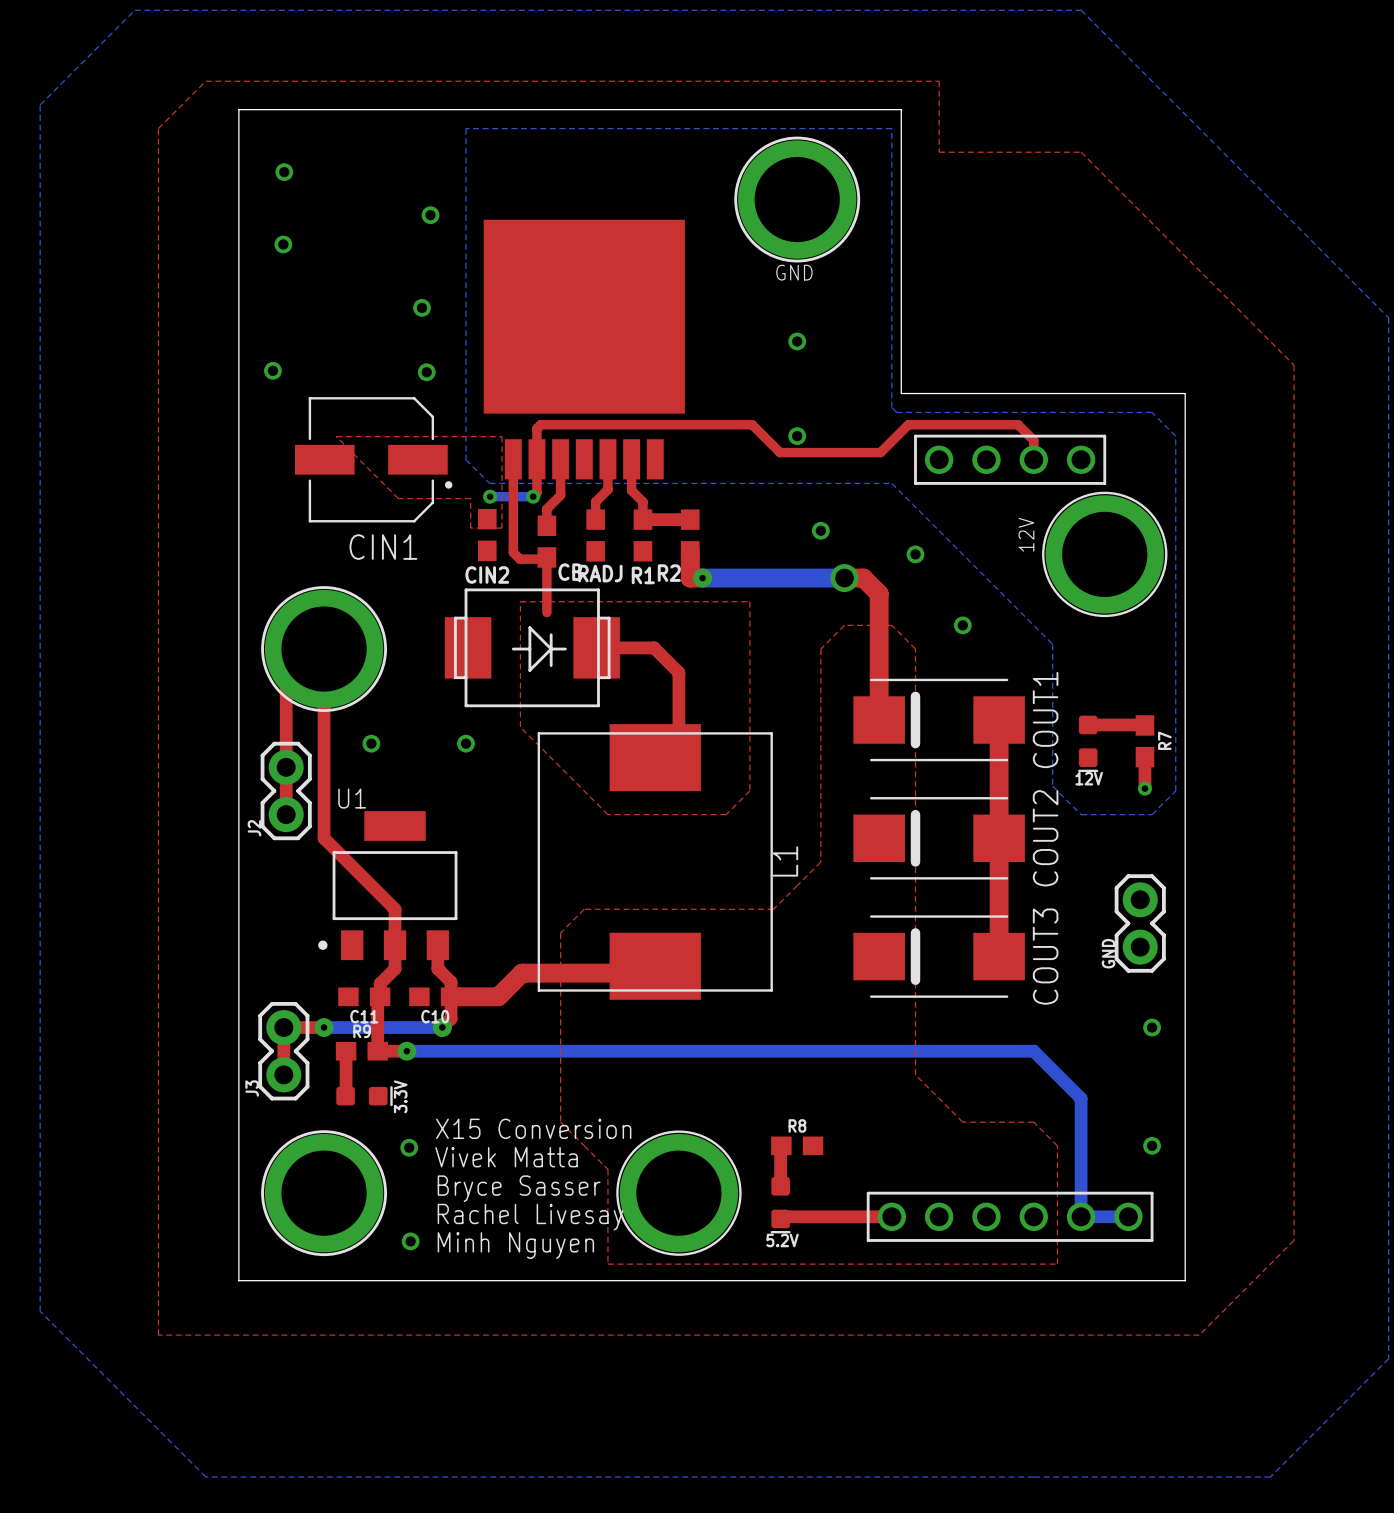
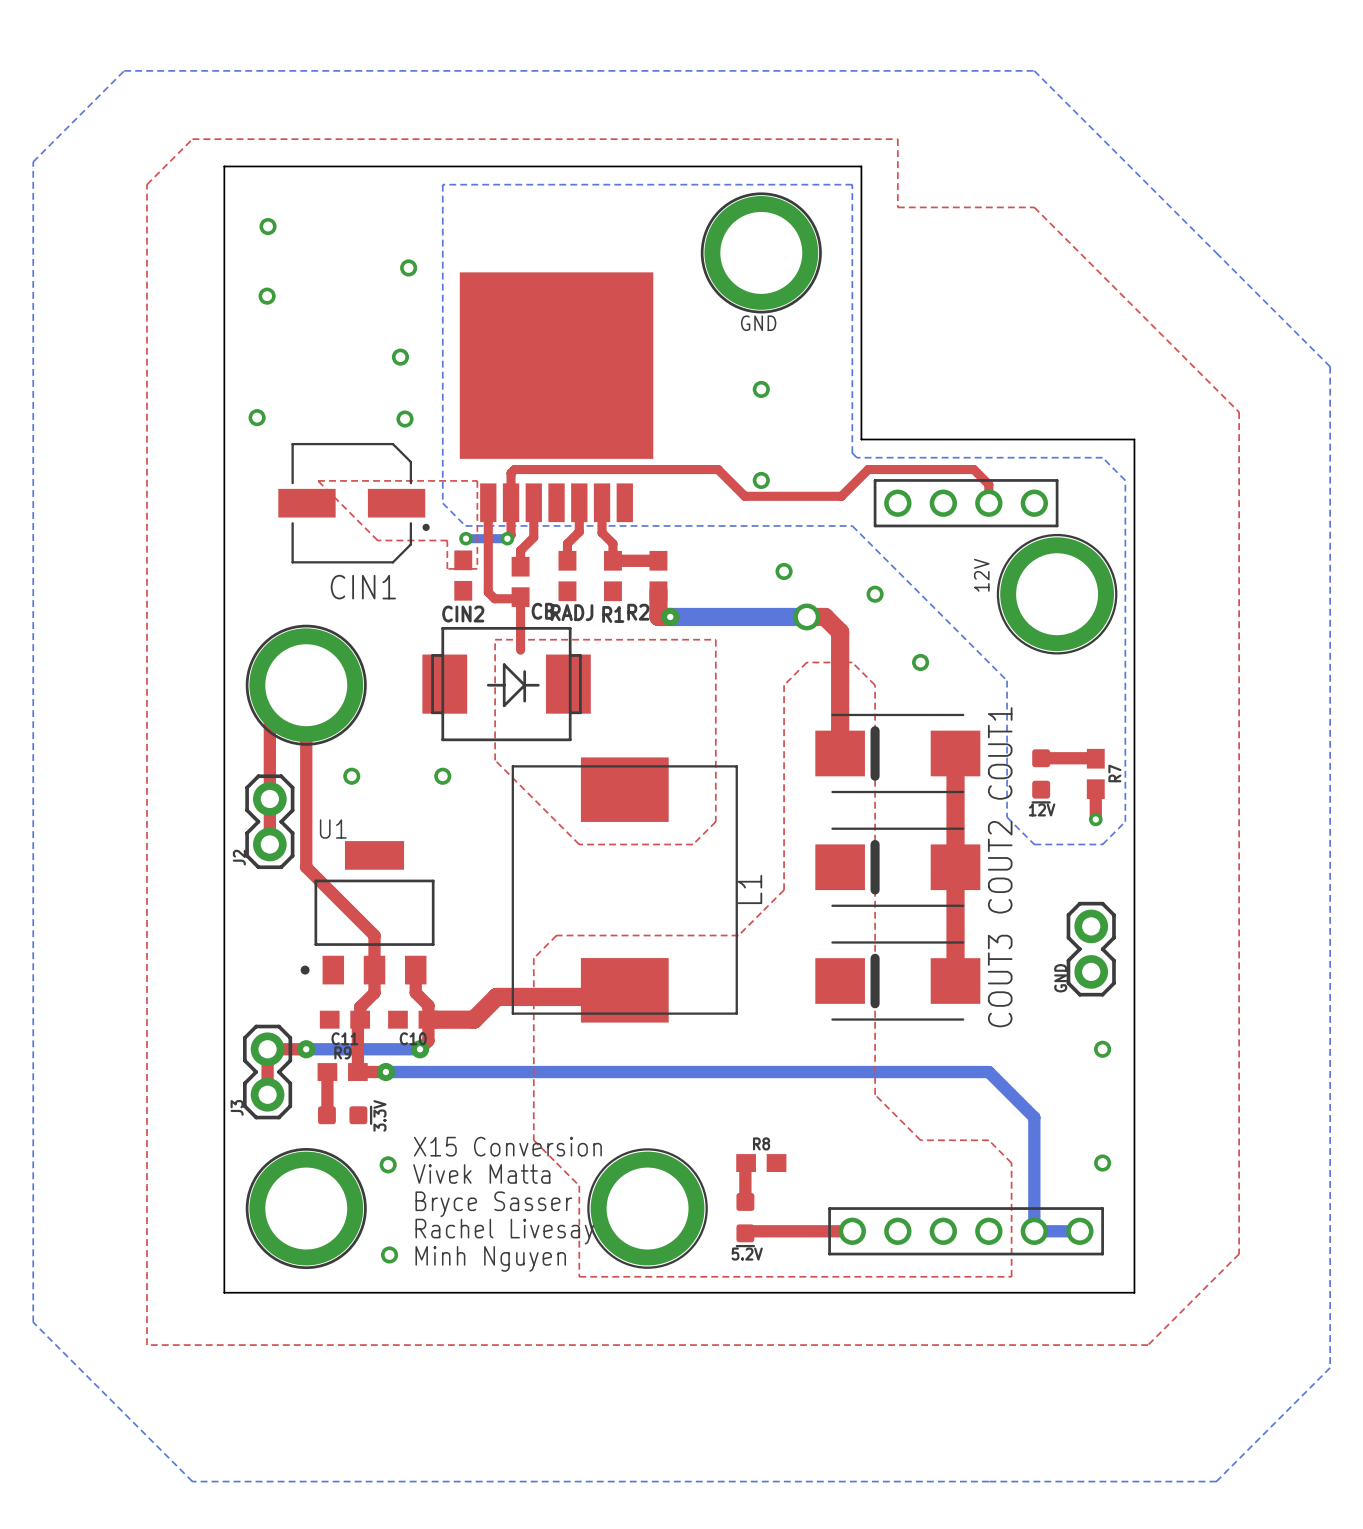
top track: (596, 647) (654, 647) (678, 672) (678, 733) (655, 757) -> none

